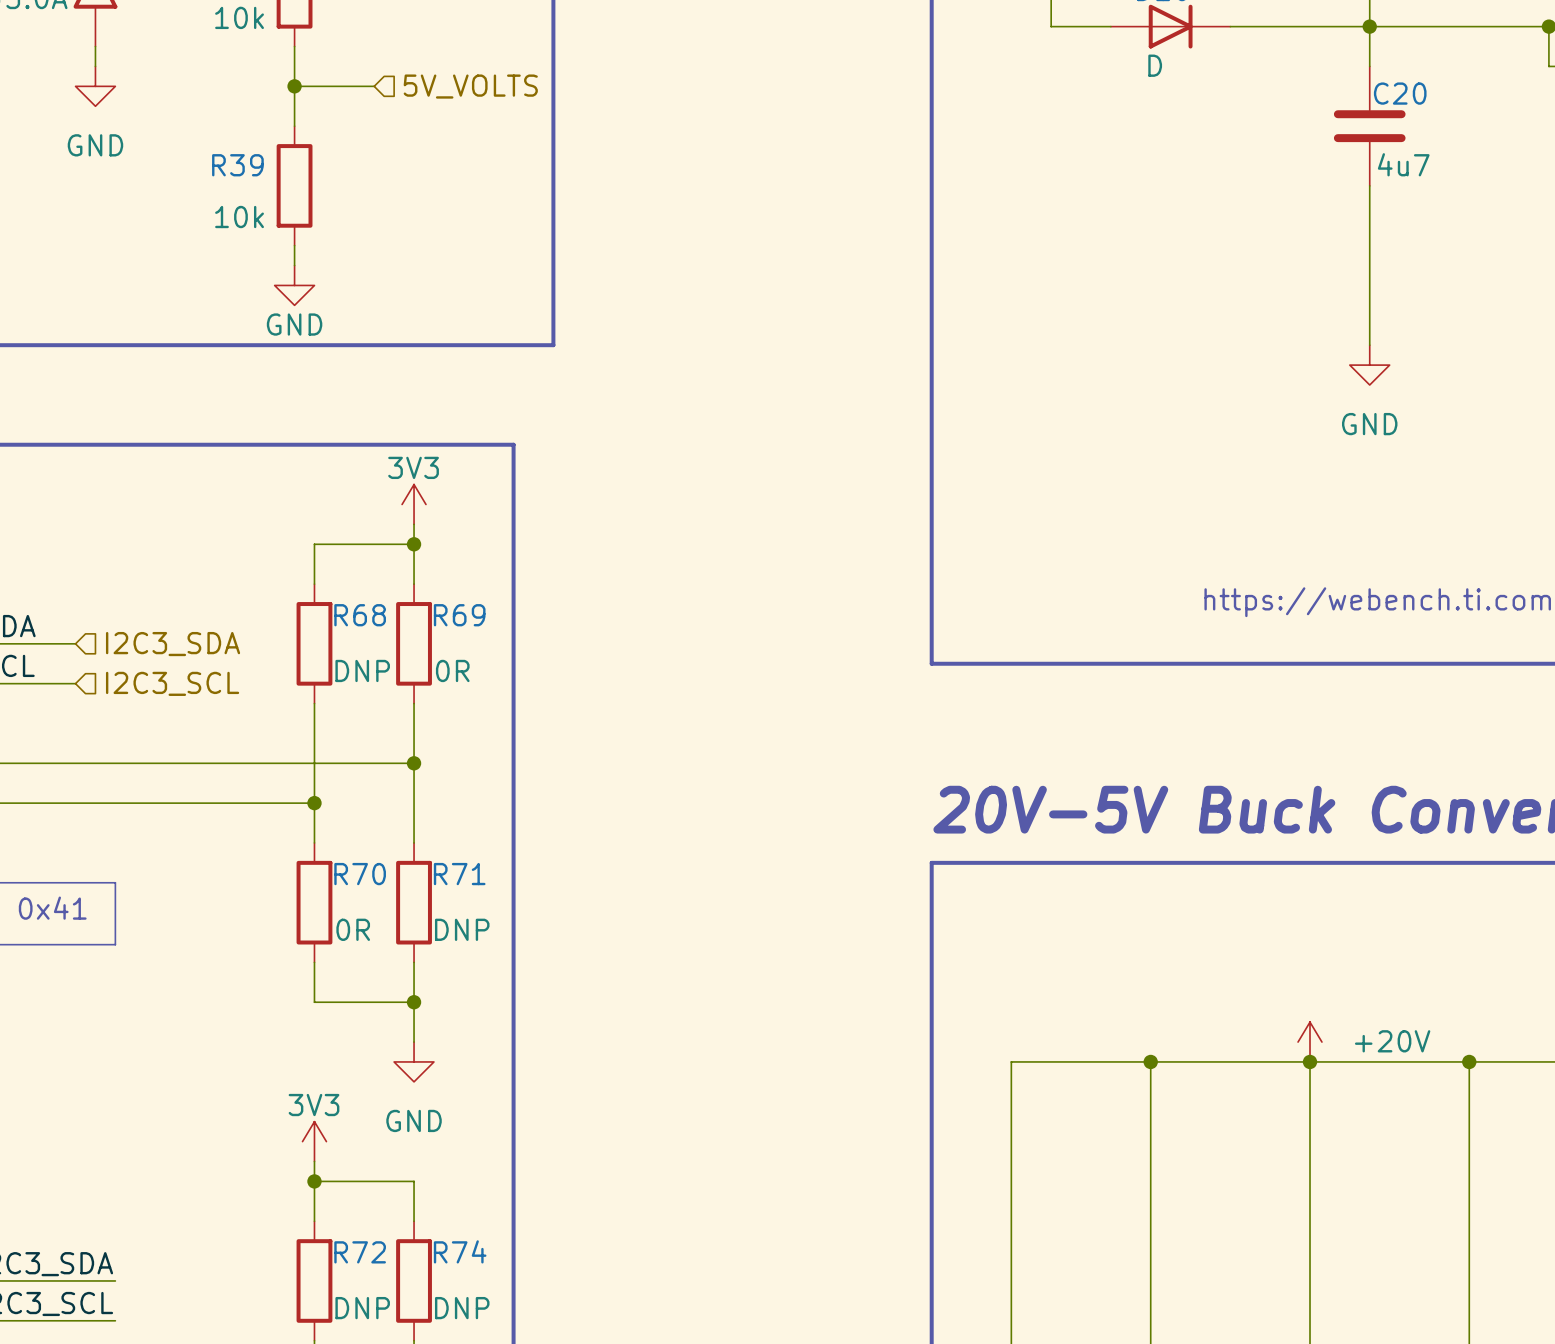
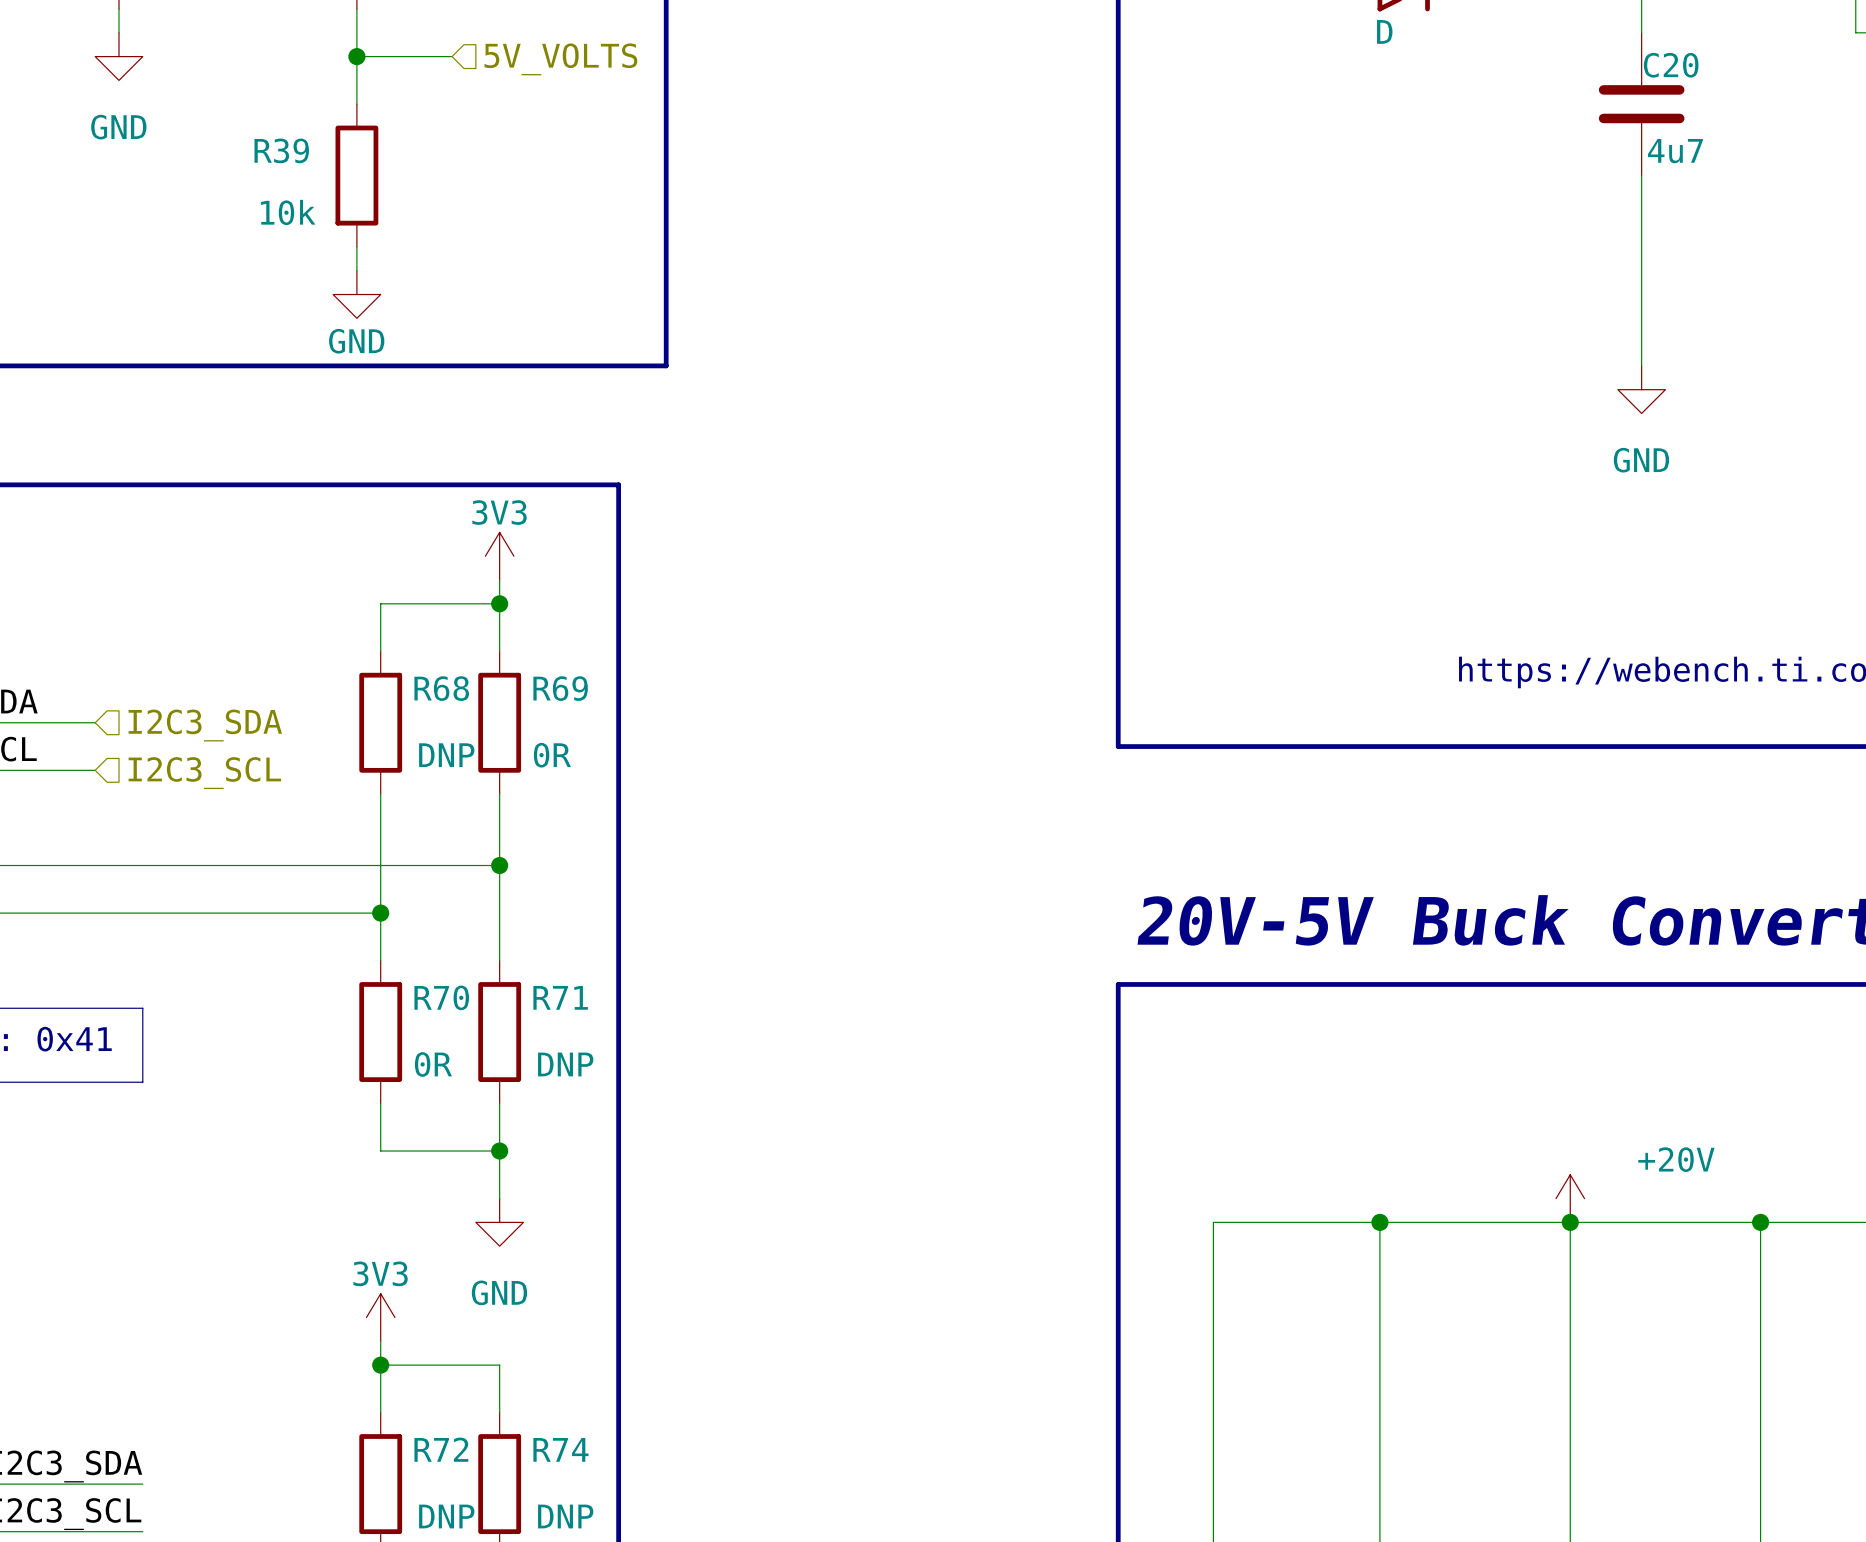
power symbol text position: +20V (1392, 1041) -> +20V (1676, 1159)

